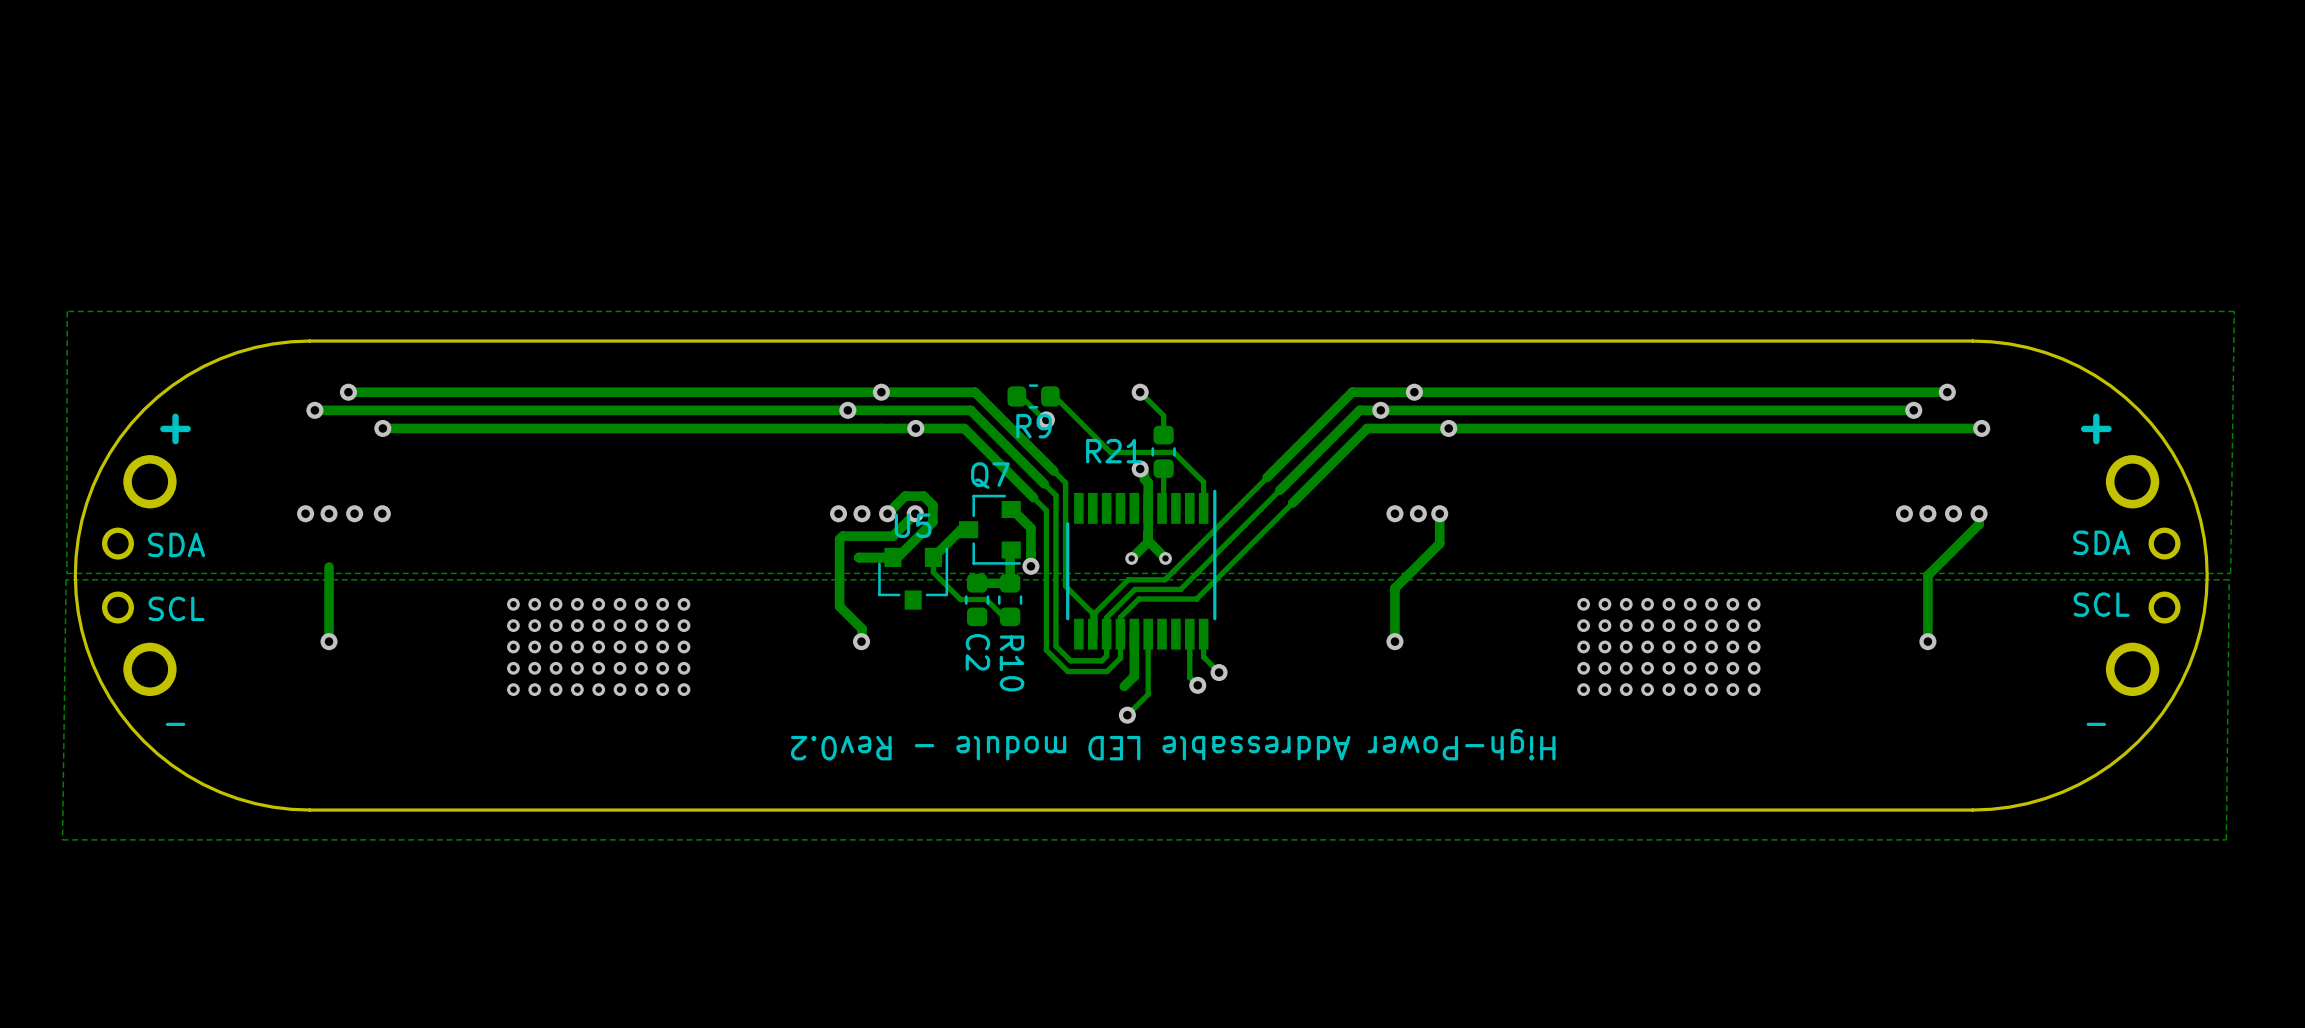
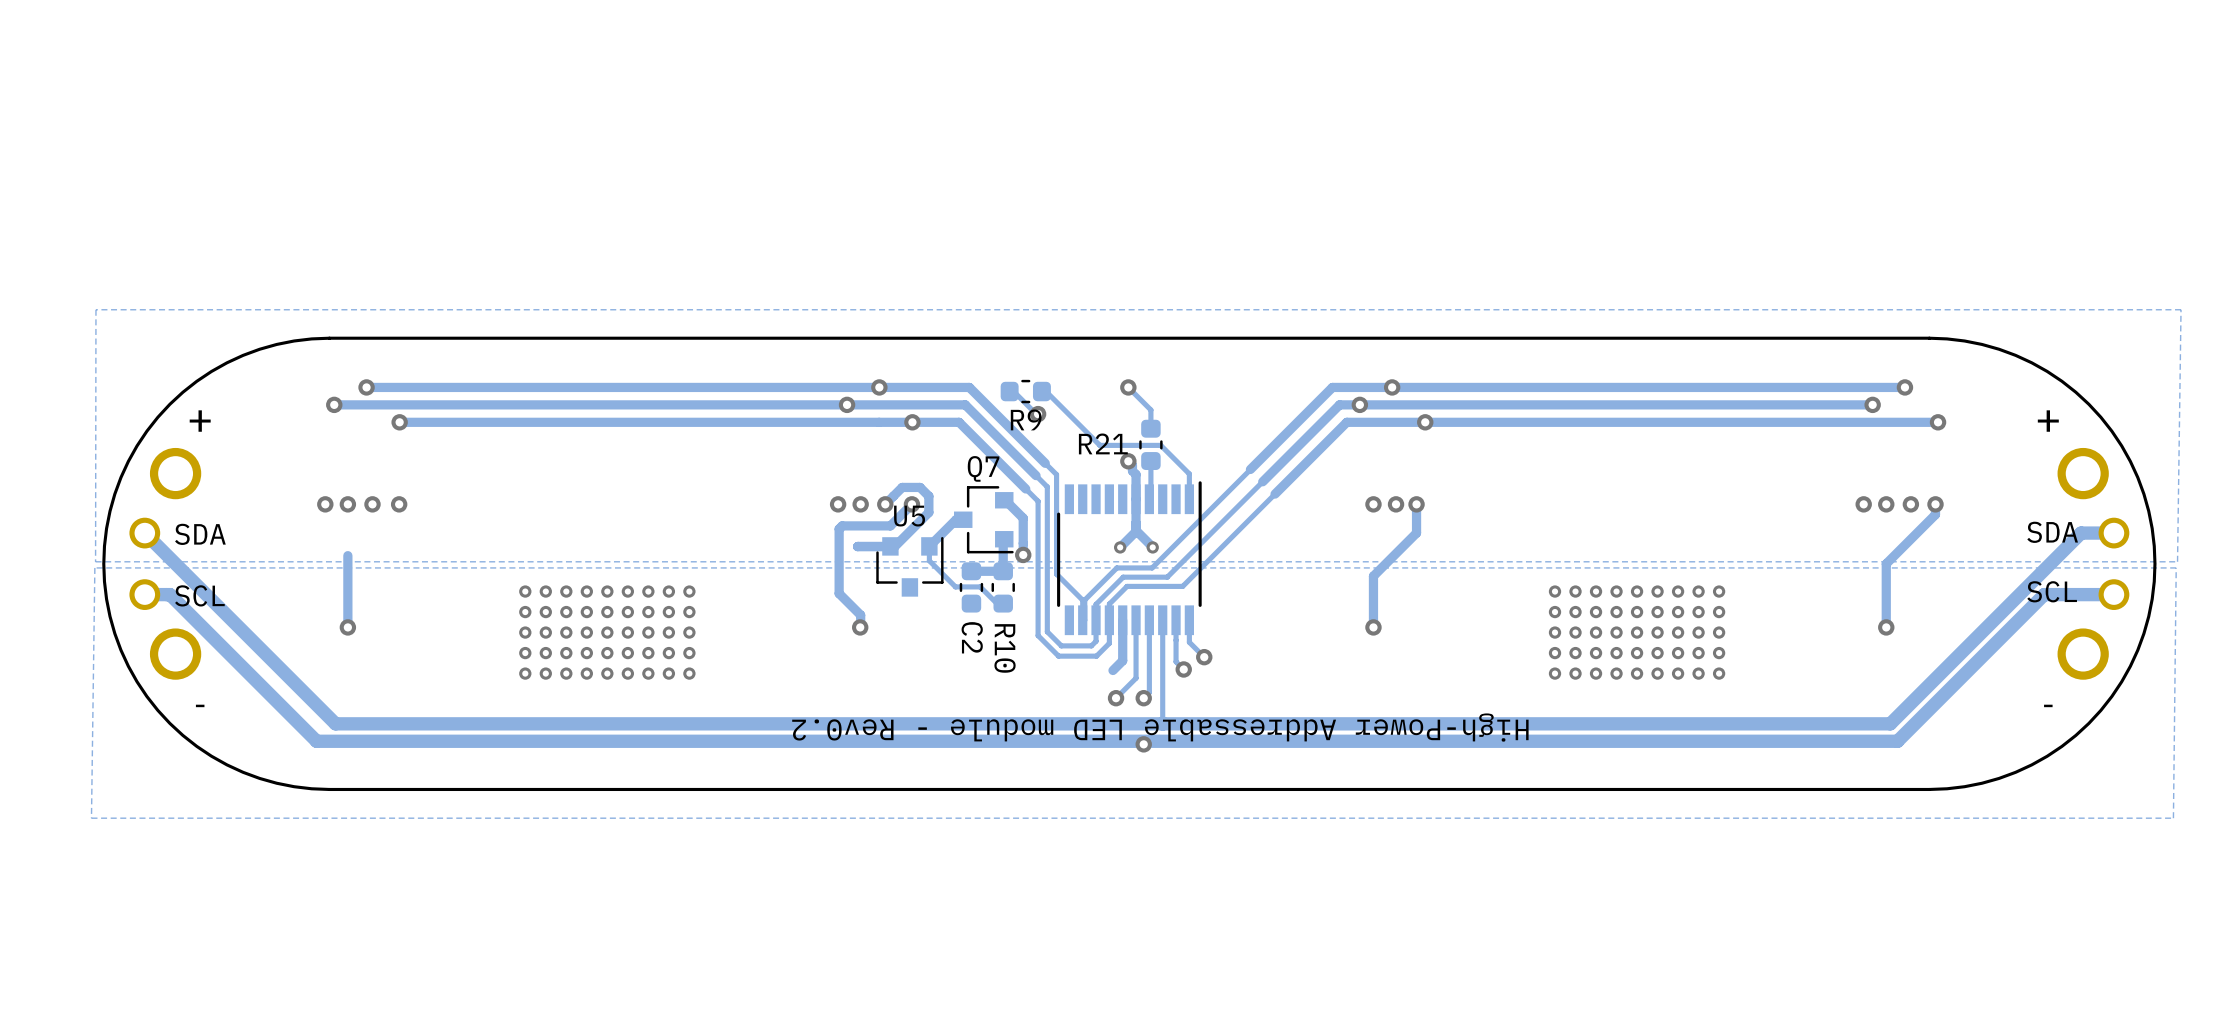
track: none -> (144, 533) (335, 723) (1162, 723)
track: none -> (2113, 533) (2081, 533) (1890, 723) (1163, 723)
track: none -> (2113, 594) (2044, 594) (1897, 741) (316, 741) (169, 594) (144, 594)
track: none -> (1149, 620) (1149, 692) (1143, 698)
track: none -> (1162, 620) (1163, 723)
via: none -> (1143, 698)
via: none -> (1143, 744)

